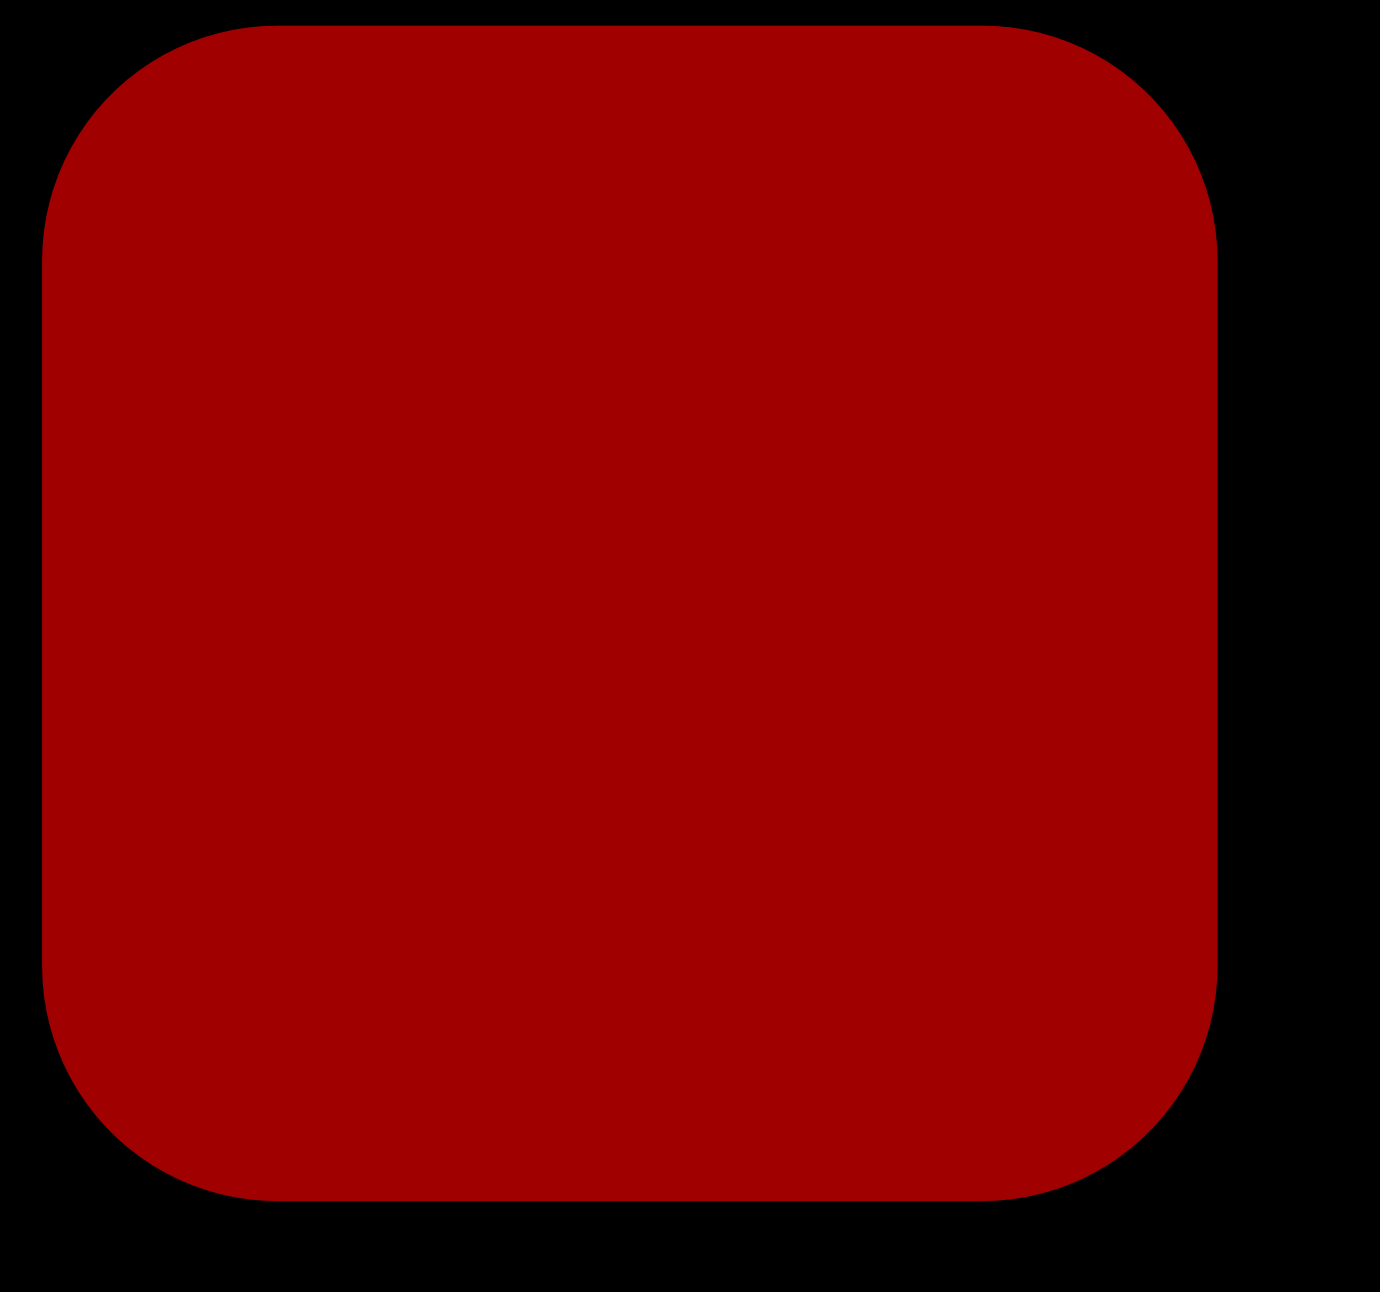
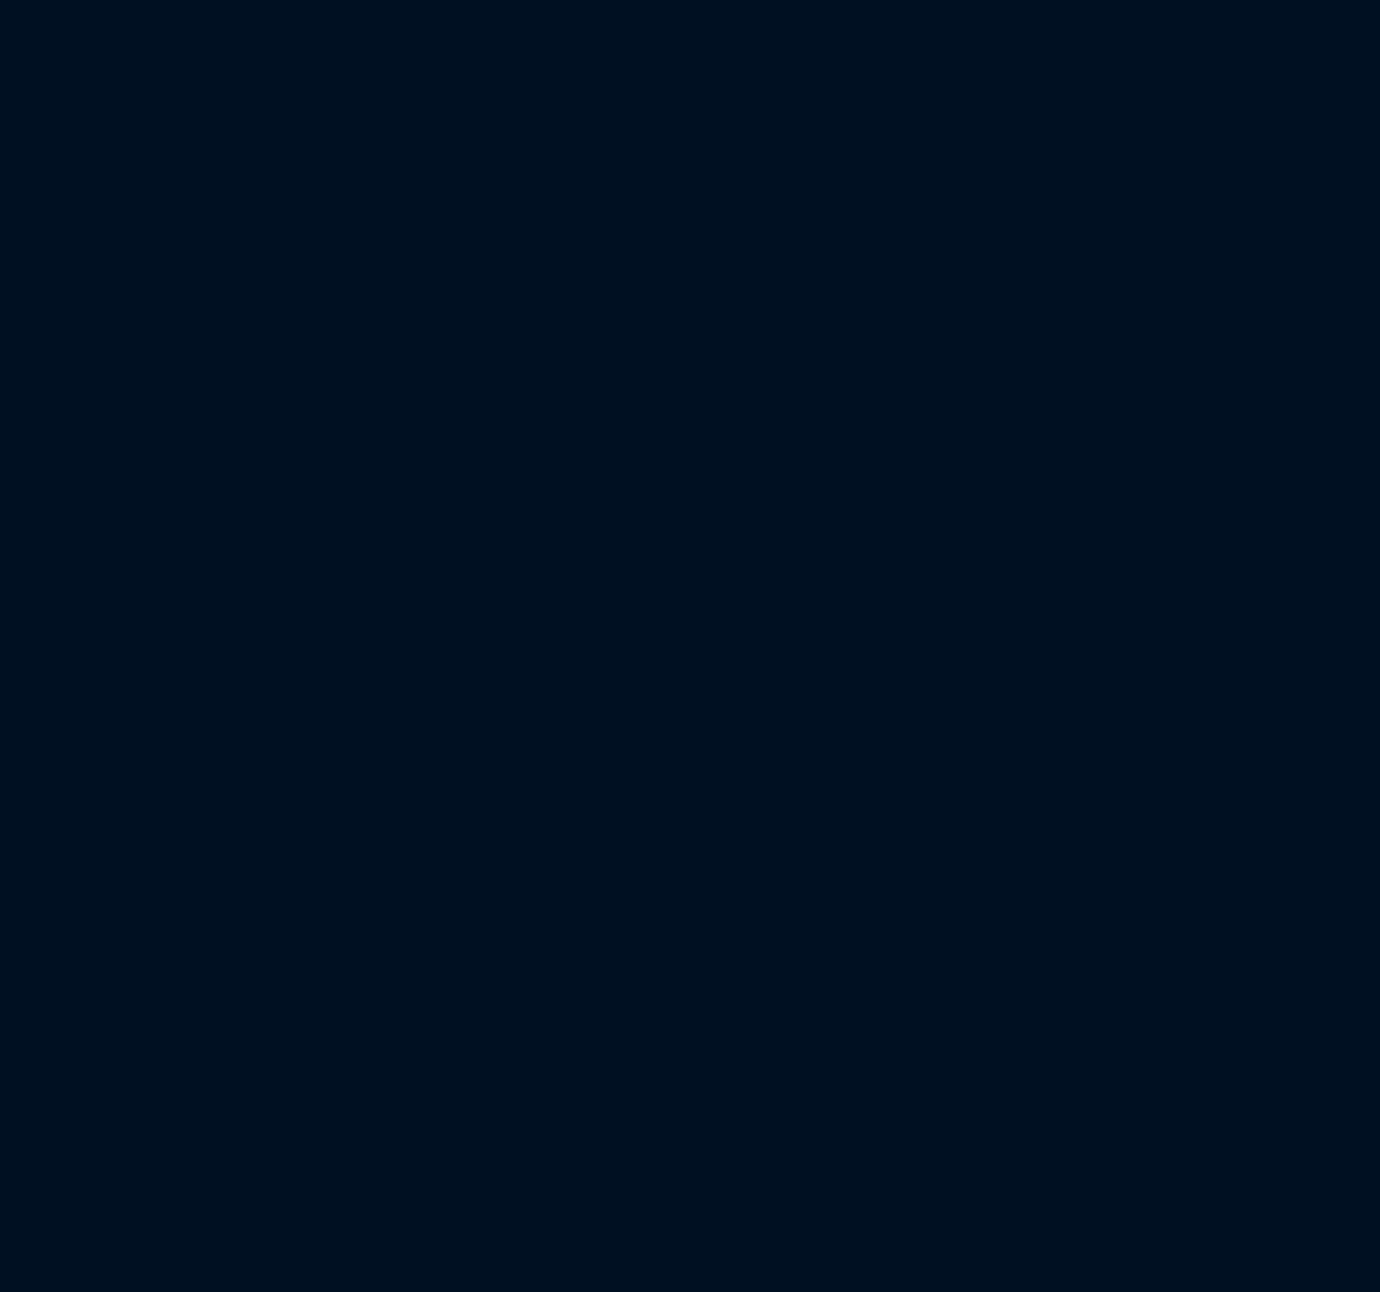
part: (629, 613) -> none

